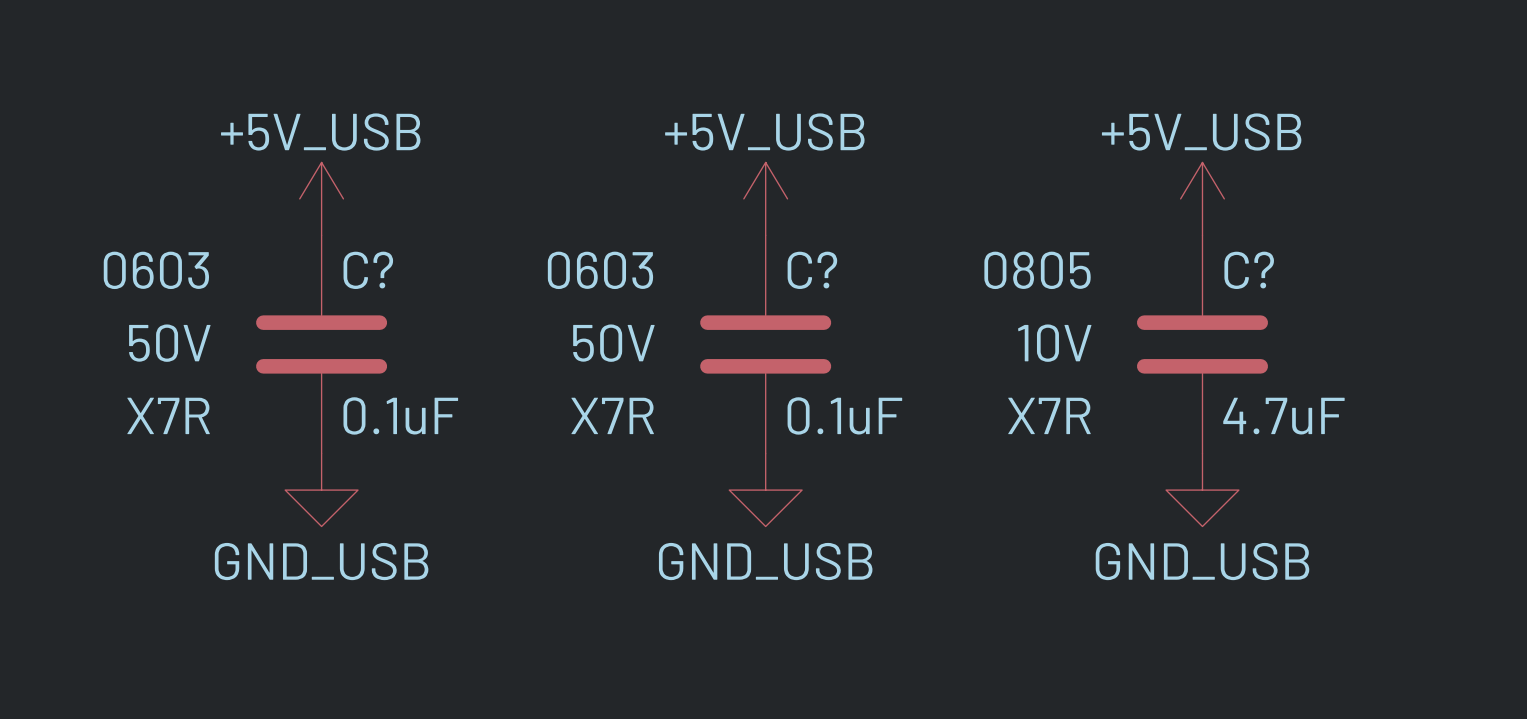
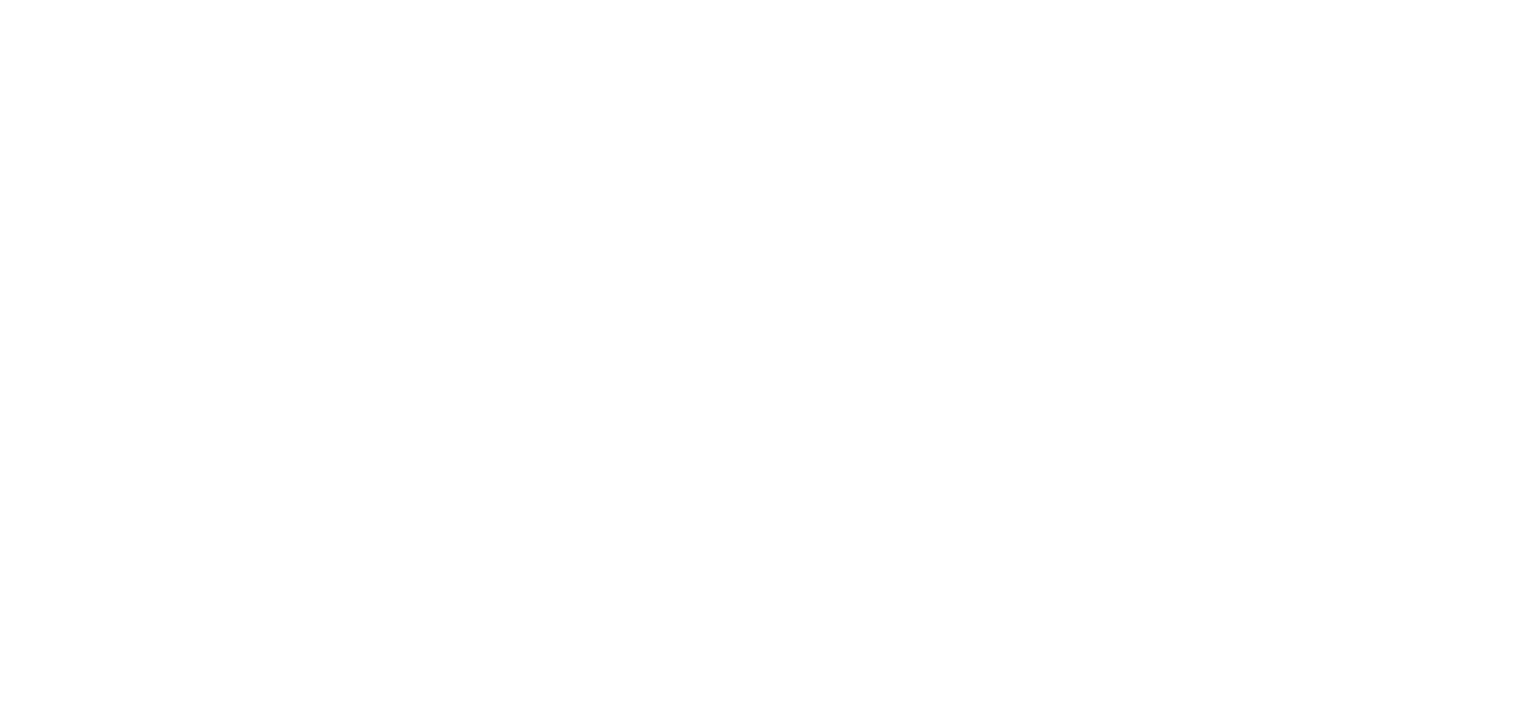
power symbol: +5V_USB (321, 198) -> none
power symbol: +5V_USB (765, 198) -> none
power symbol: +5V_USB (1202, 198) -> none
C?: 0.1uF (321, 344) -> none
C?: 0.1uF (765, 344) -> none
C?: 4.7uF (1202, 344) -> none
power symbol: GND_USB (321, 490) -> none
power symbol: GND_USB (765, 490) -> none
power symbol: GND_USB (1202, 490) -> none

